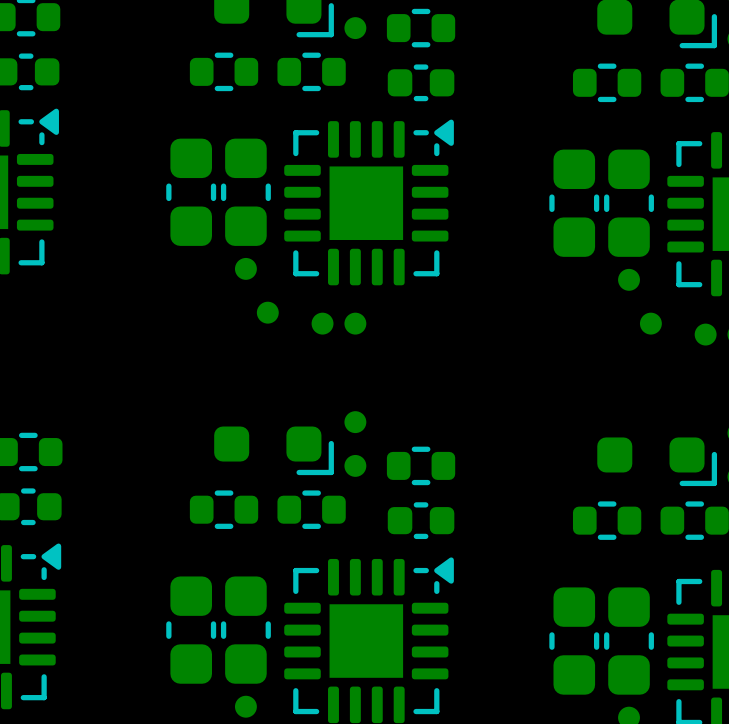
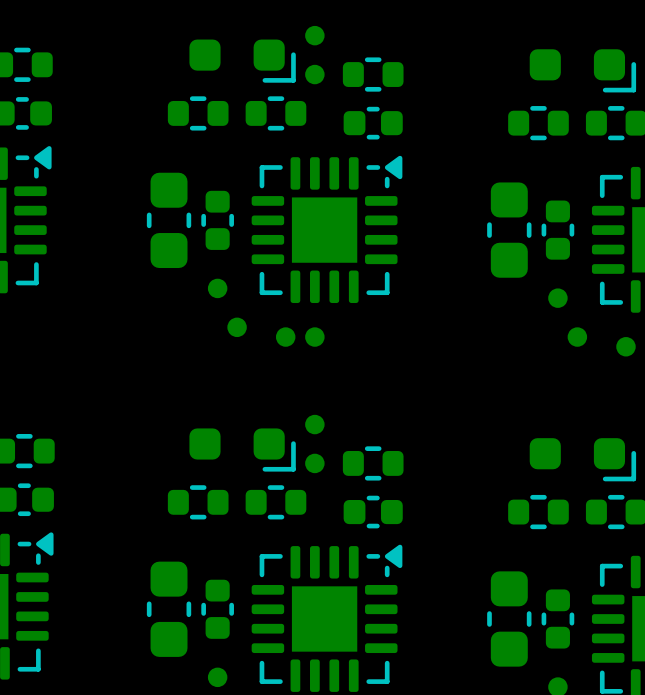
part footprint: [220, 138, 271, 246] -> [201, 190, 234, 250]
part footprint: [604, 149, 654, 257] -> [541, 200, 575, 260]
part footprint: [220, 576, 271, 684] -> [201, 579, 234, 639]
part footprint: [604, 587, 654, 695] -> [541, 589, 575, 649]

